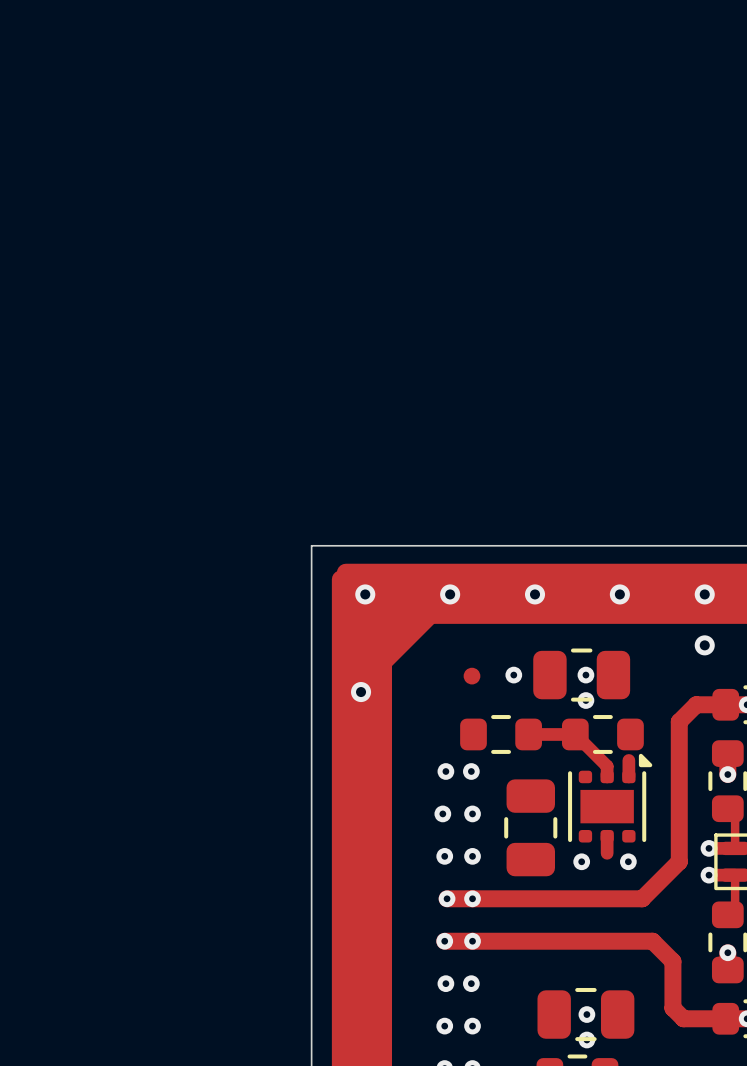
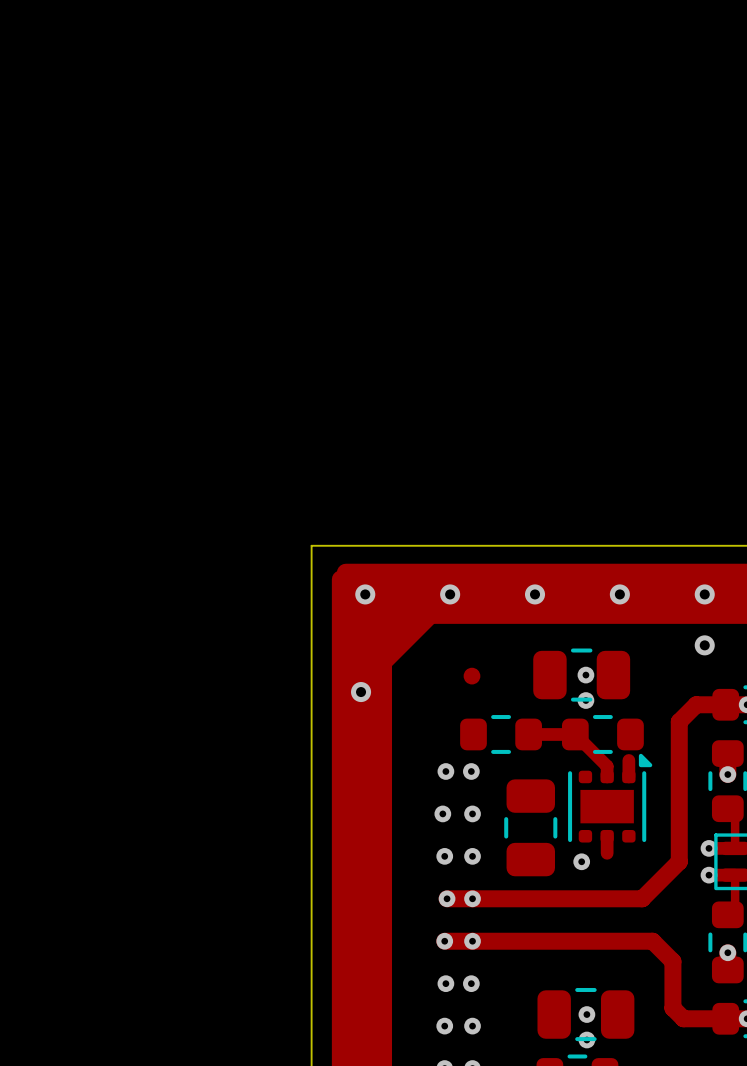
via: (513, 675) -> none
via: (628, 861) -> none

